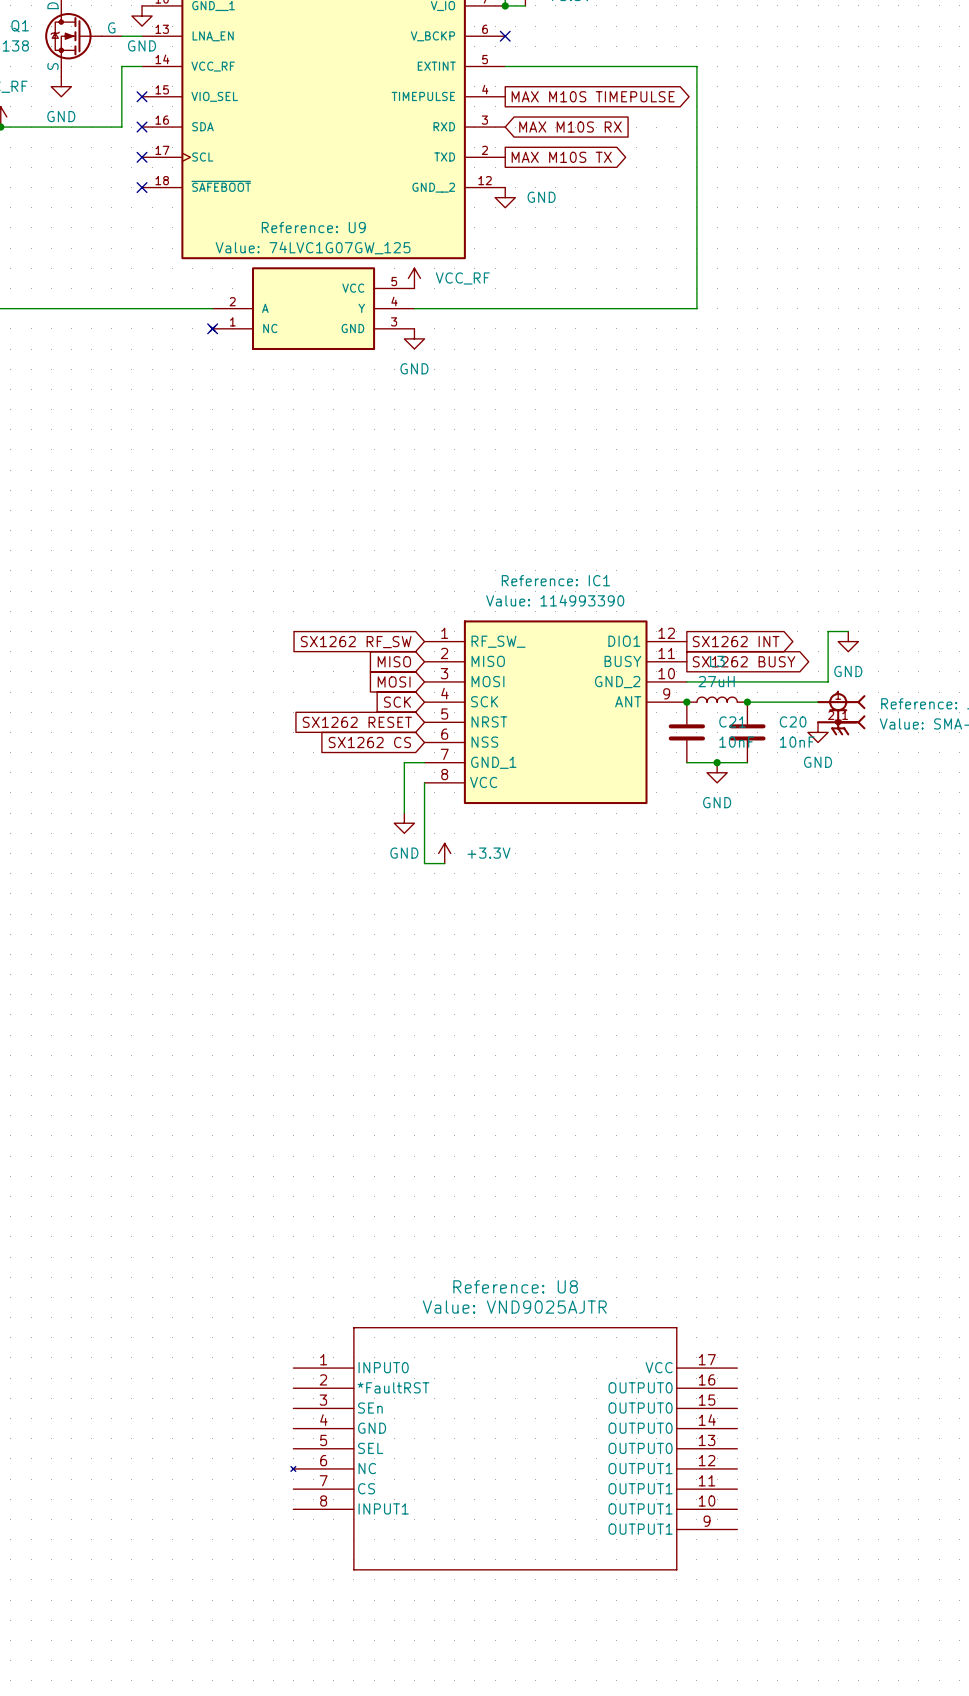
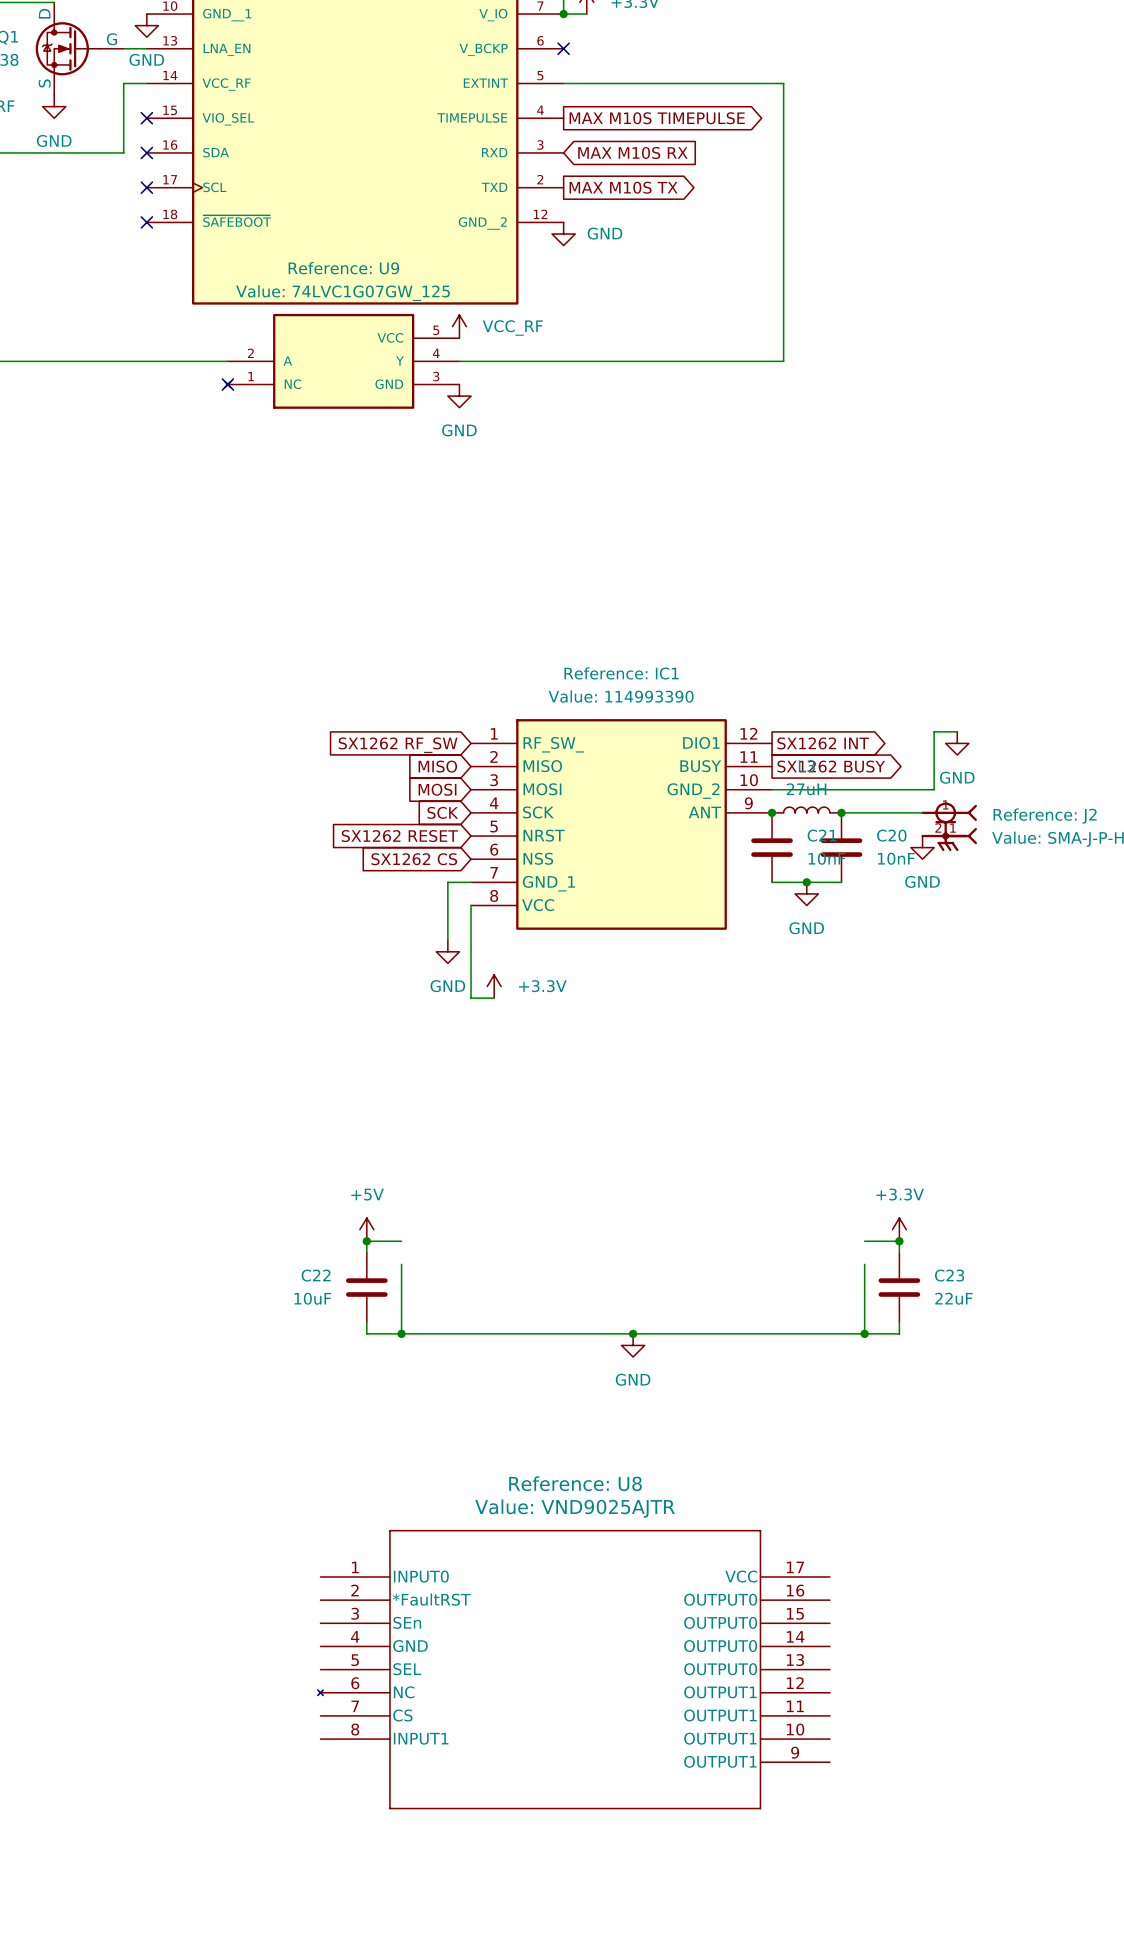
power symbol: none -> +5V (366, 1229)
power symbol: none -> +3.3V (899, 1229)
junction: none -> (366, 1241)
wire: none -> (401, 1241) (366, 1241) (366, 1252)
wire: none -> (864, 1241) (899, 1241) (899, 1252)
junction: none -> (899, 1241)
wire: none -> (401, 1264) (401, 1333)
wire: none -> (864, 1264) (864, 1333)
C22: none -> 10uF (366, 1287)
C23: none -> 22uF (899, 1287)
wire: none -> (366, 1322) (366, 1333) (899, 1333) (899, 1322)
junction: none -> (401, 1333)
junction: none -> (633, 1333)
junction: none -> (864, 1333)
power symbol: none -> GND (633, 1345)

